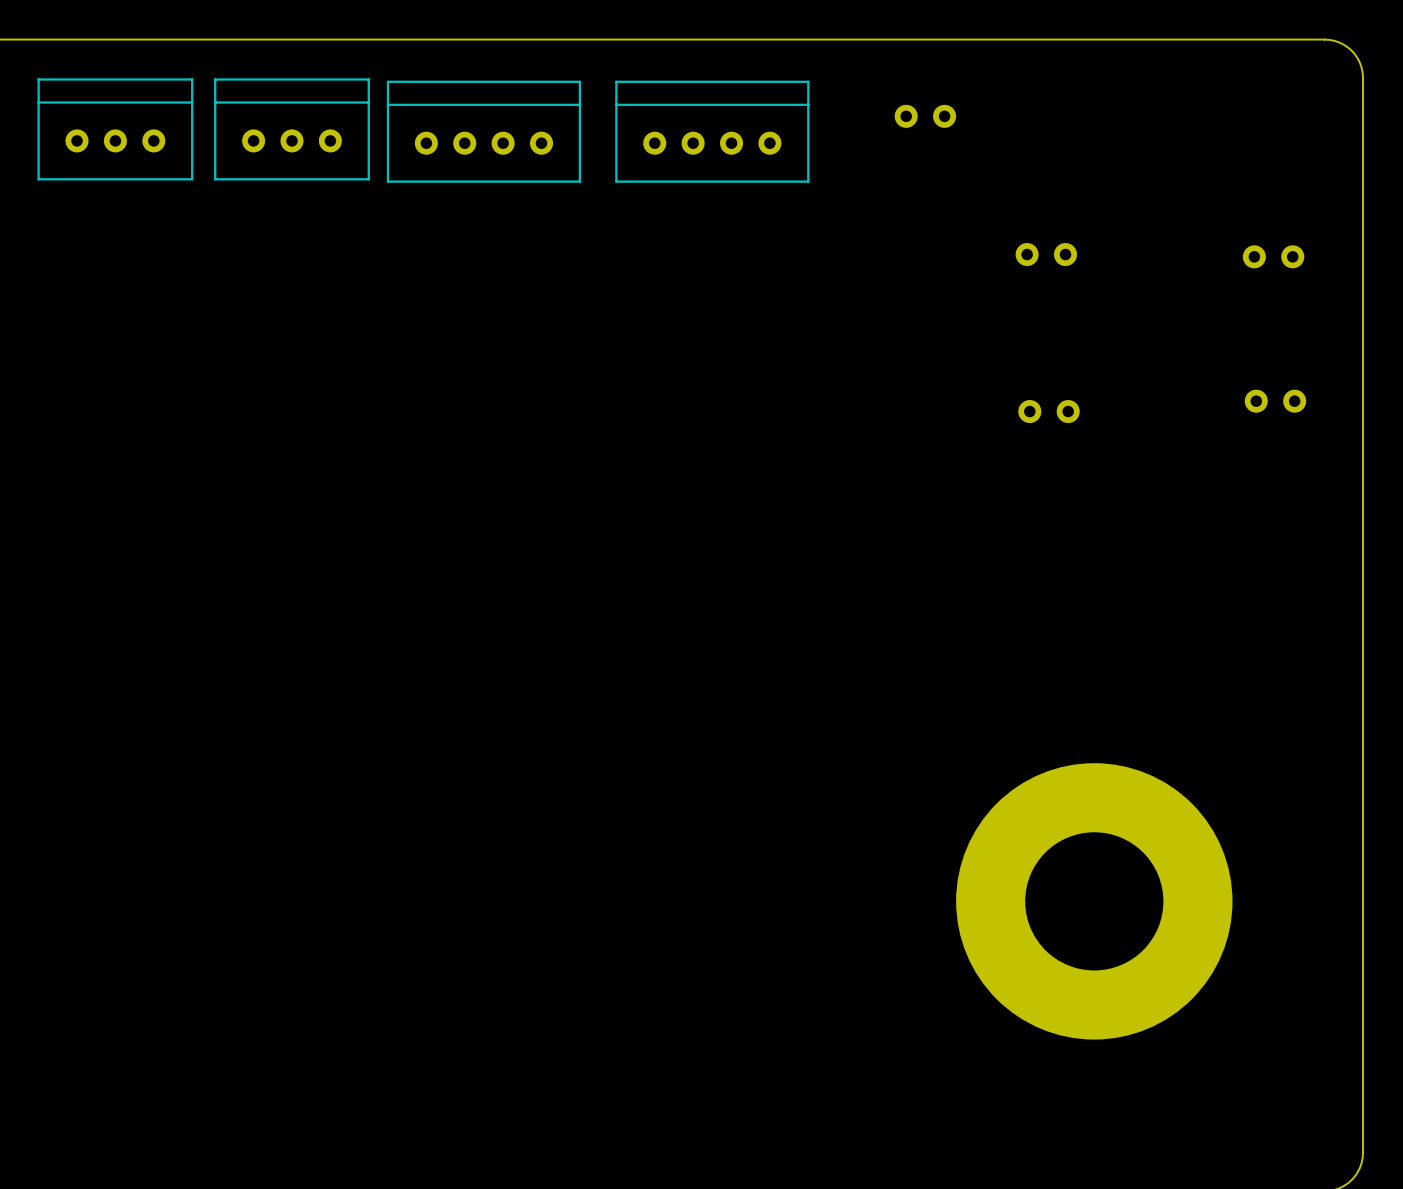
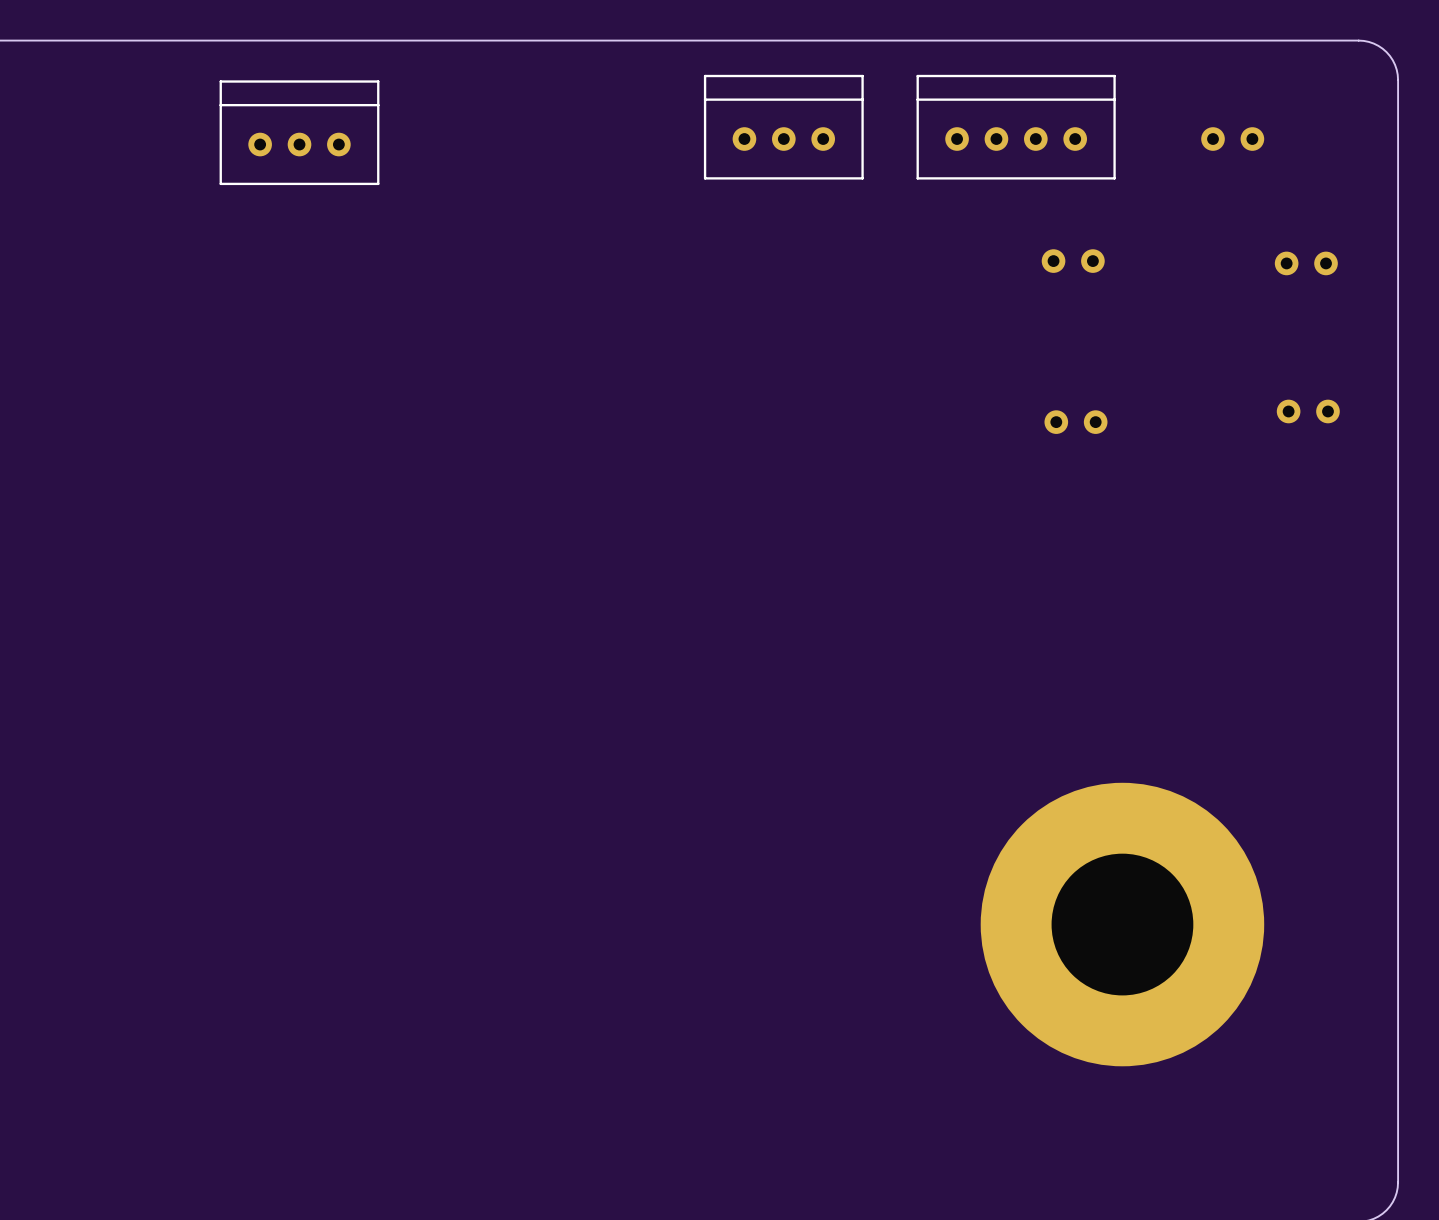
part position: (925, 116) -> (1232, 139)
part: none -> (783, 127)
part: none -> (1016, 127)
part: (115, 129) -> none
part: (483, 131) -> none
part: (712, 131) -> none

